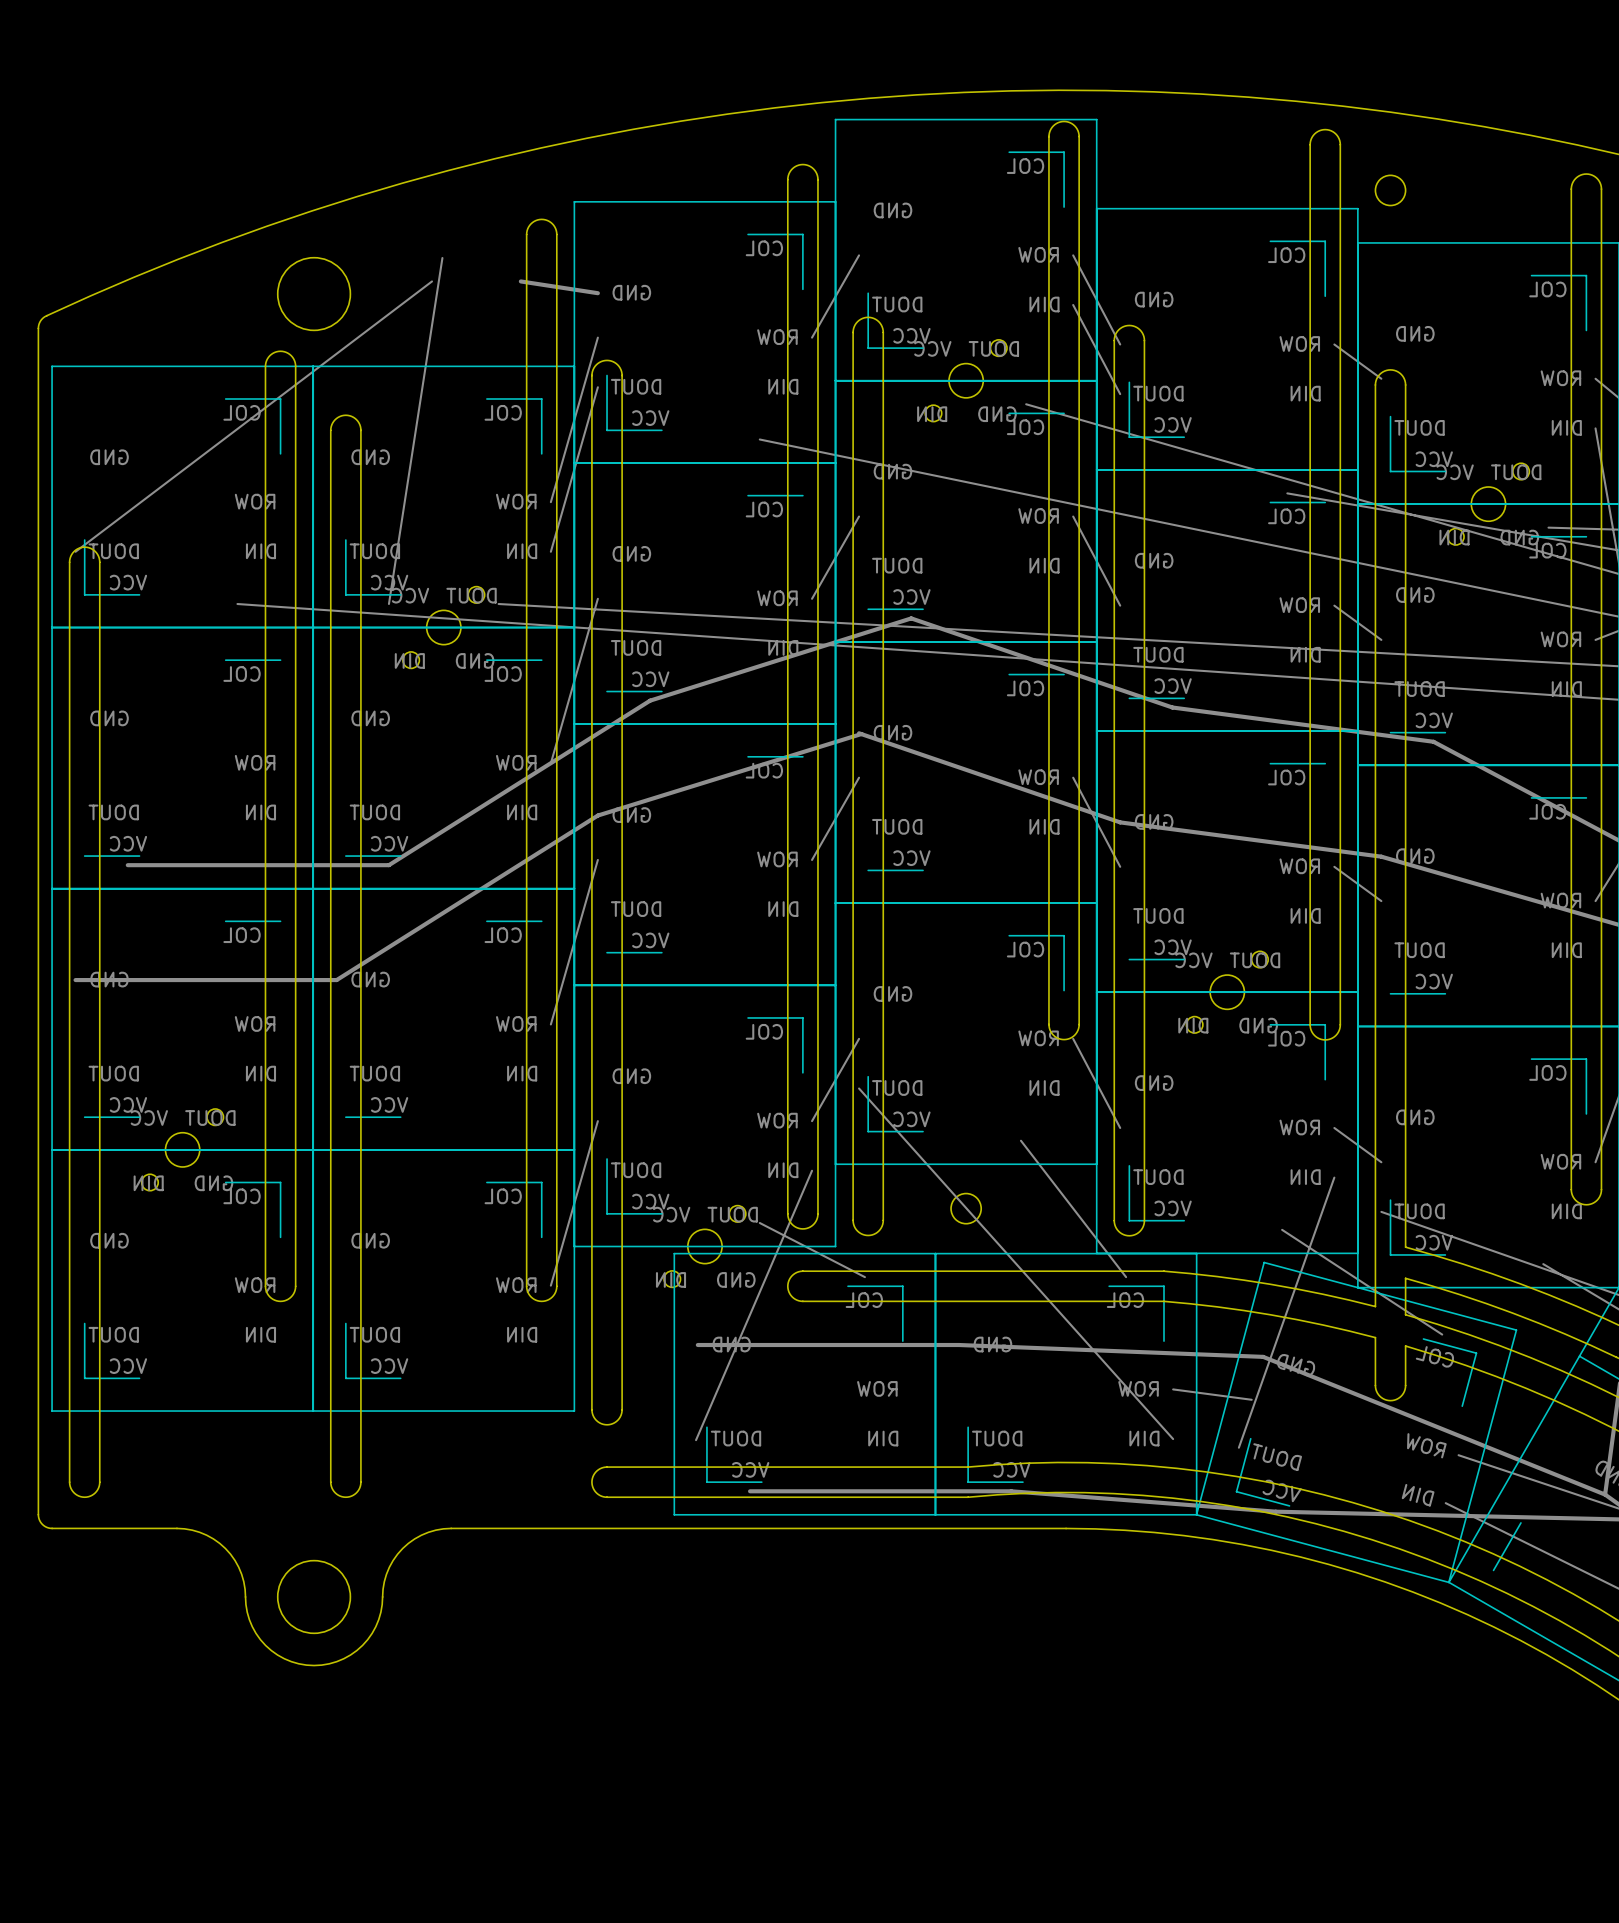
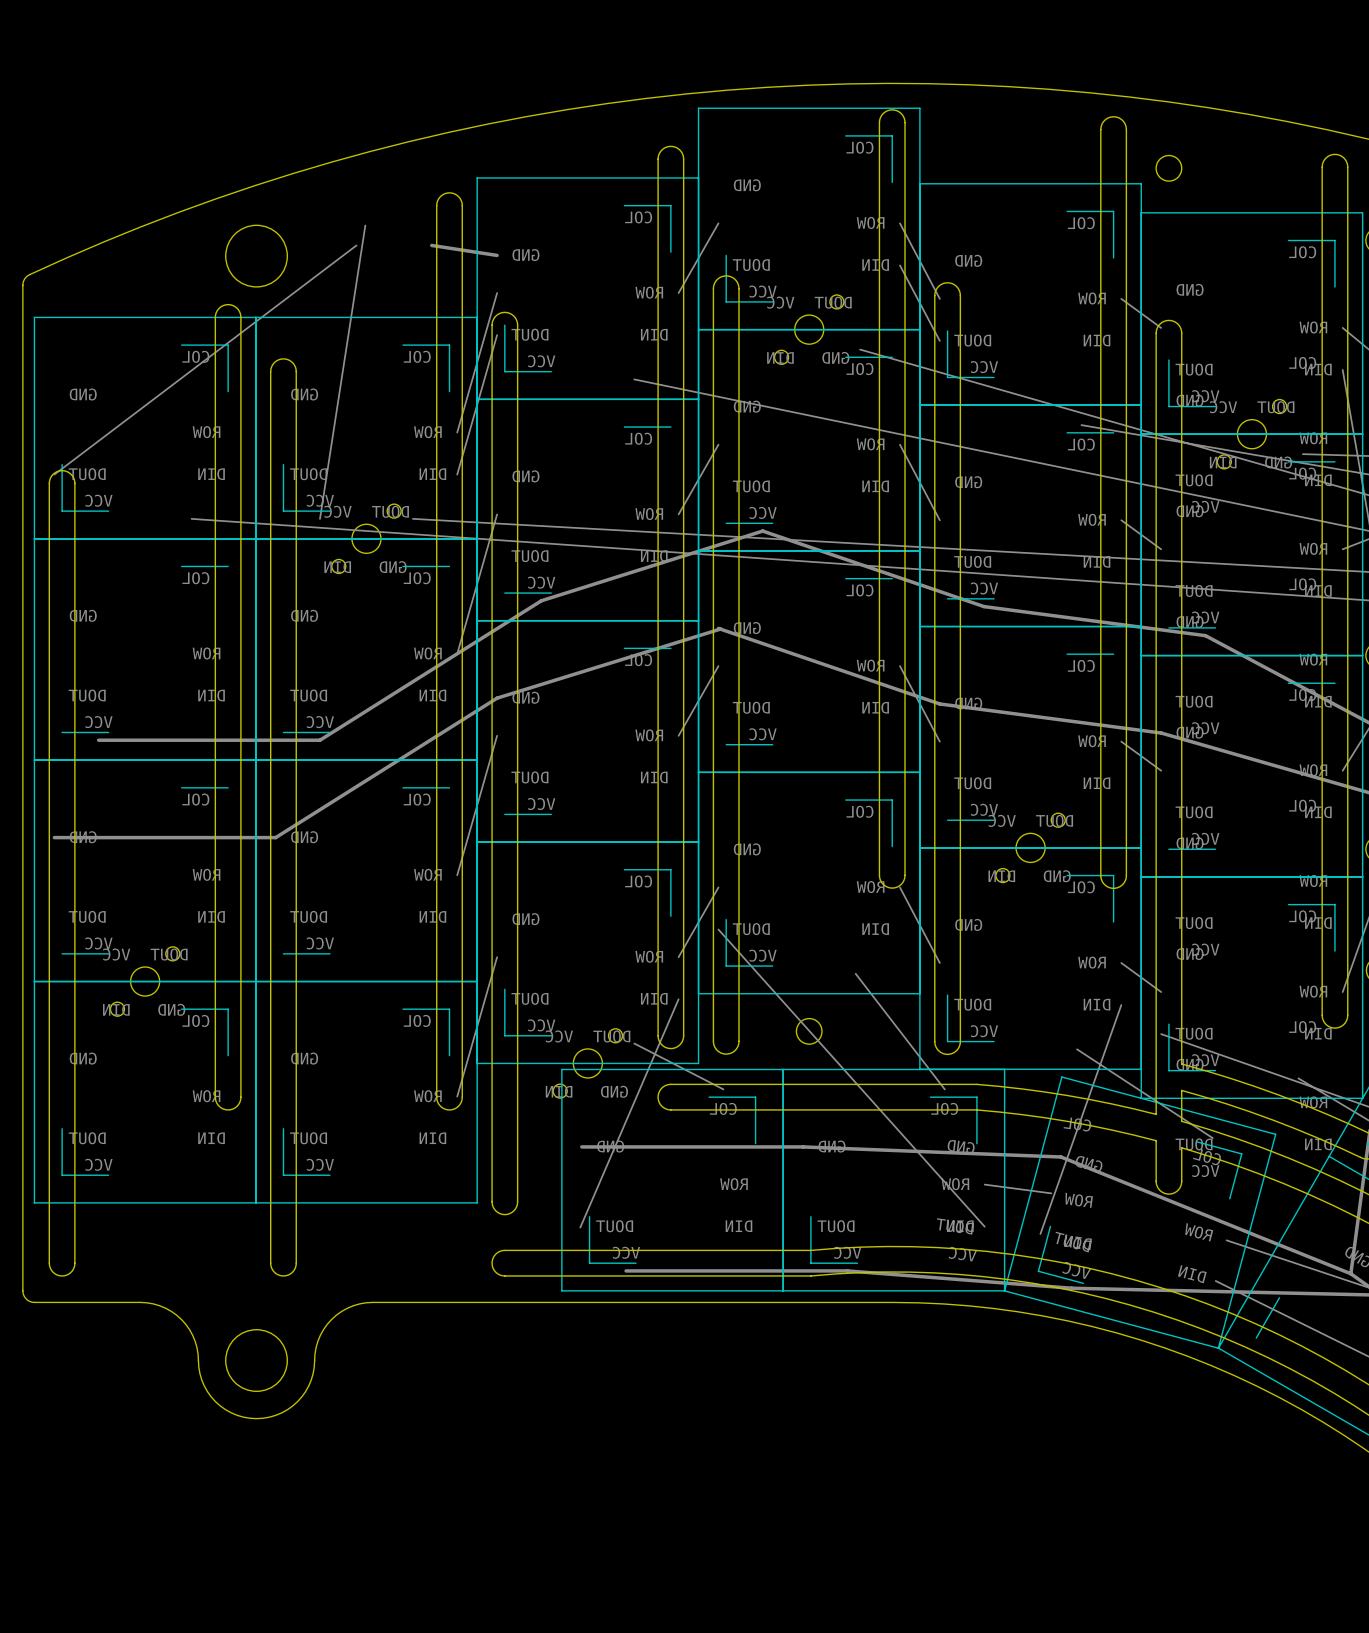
drawing: none -> [1175, 356, 1332, 513]
drawing: none -> [1175, 578, 1332, 735]
drawing: none -> [1175, 799, 1332, 956]
drawing: none -> [1175, 1021, 1332, 1178]
drawing: none -> [936, 1117, 1093, 1262]

